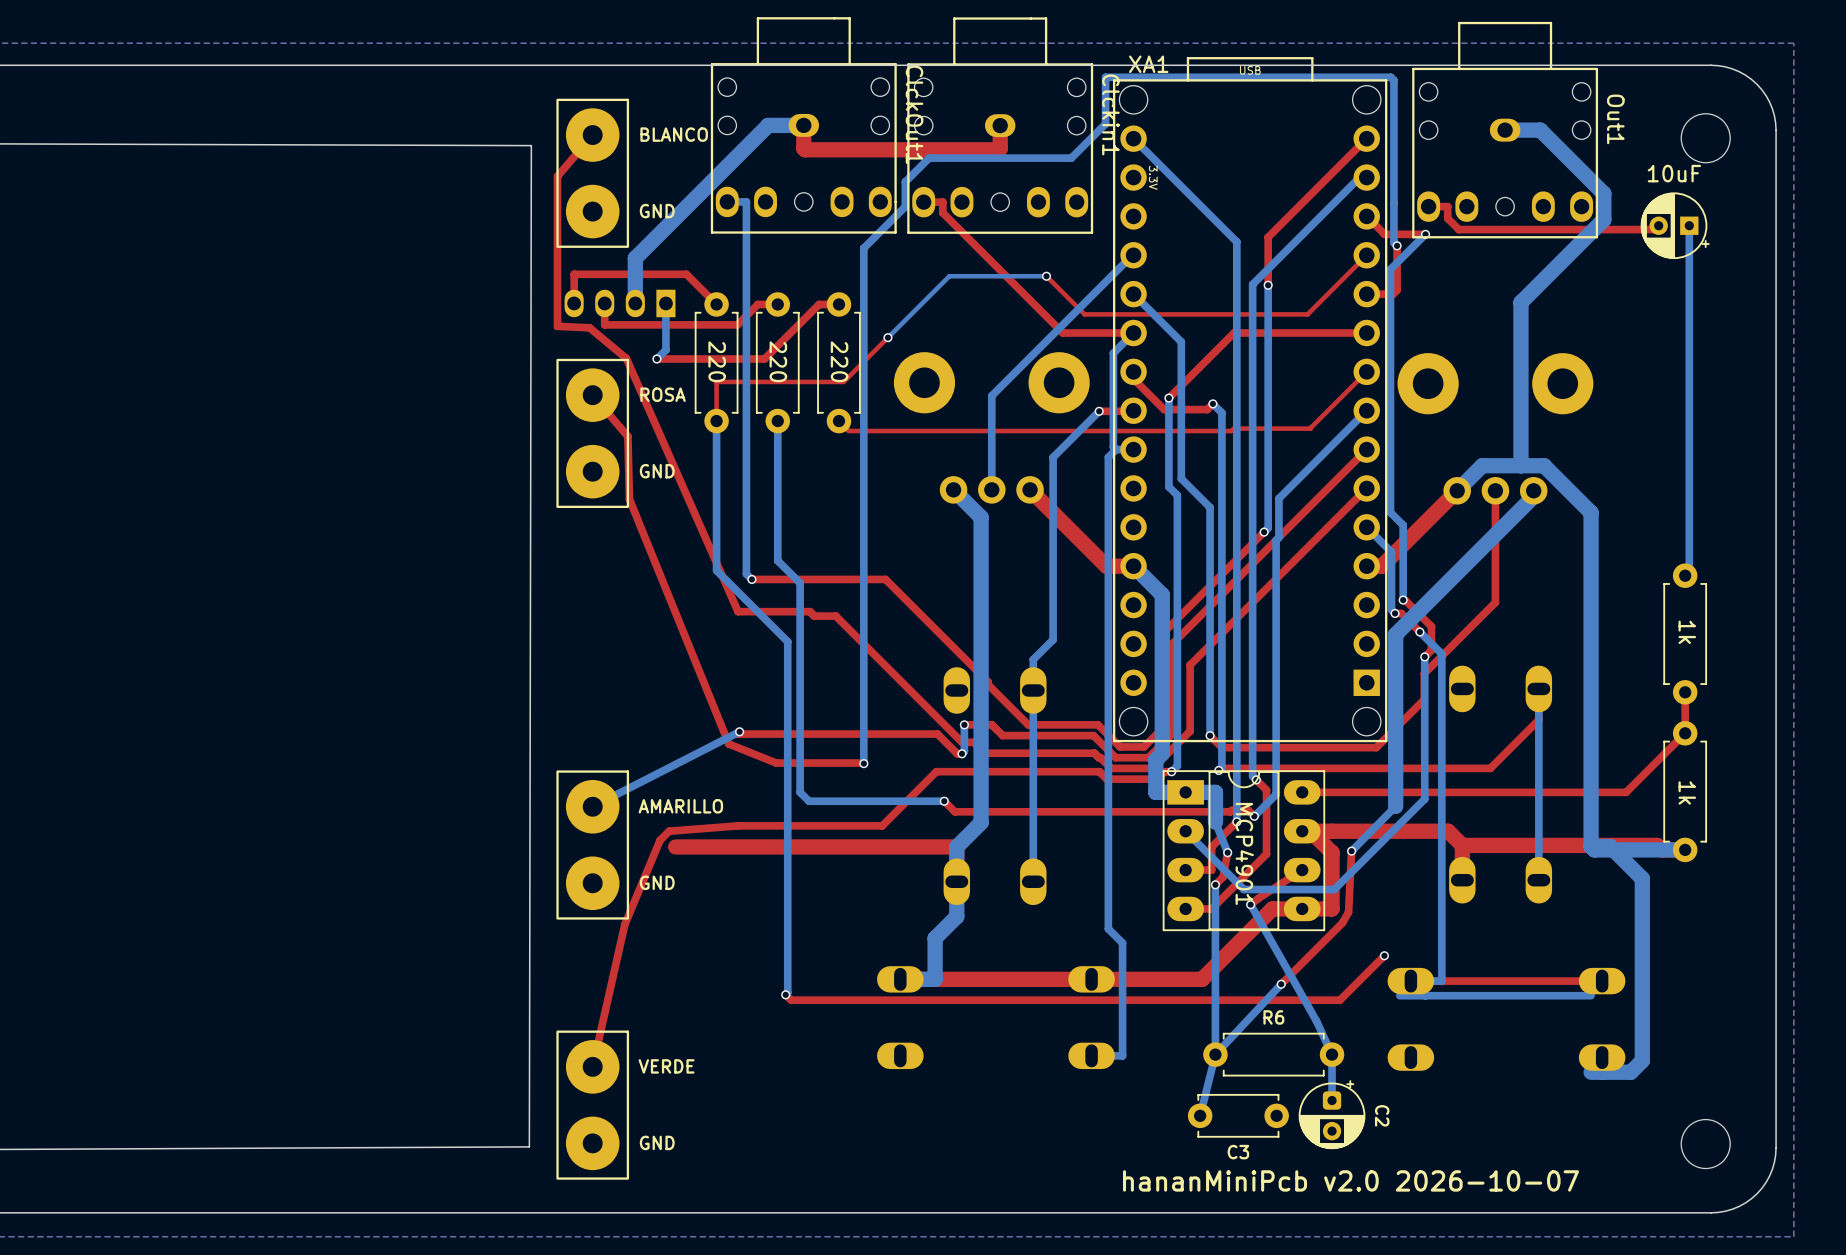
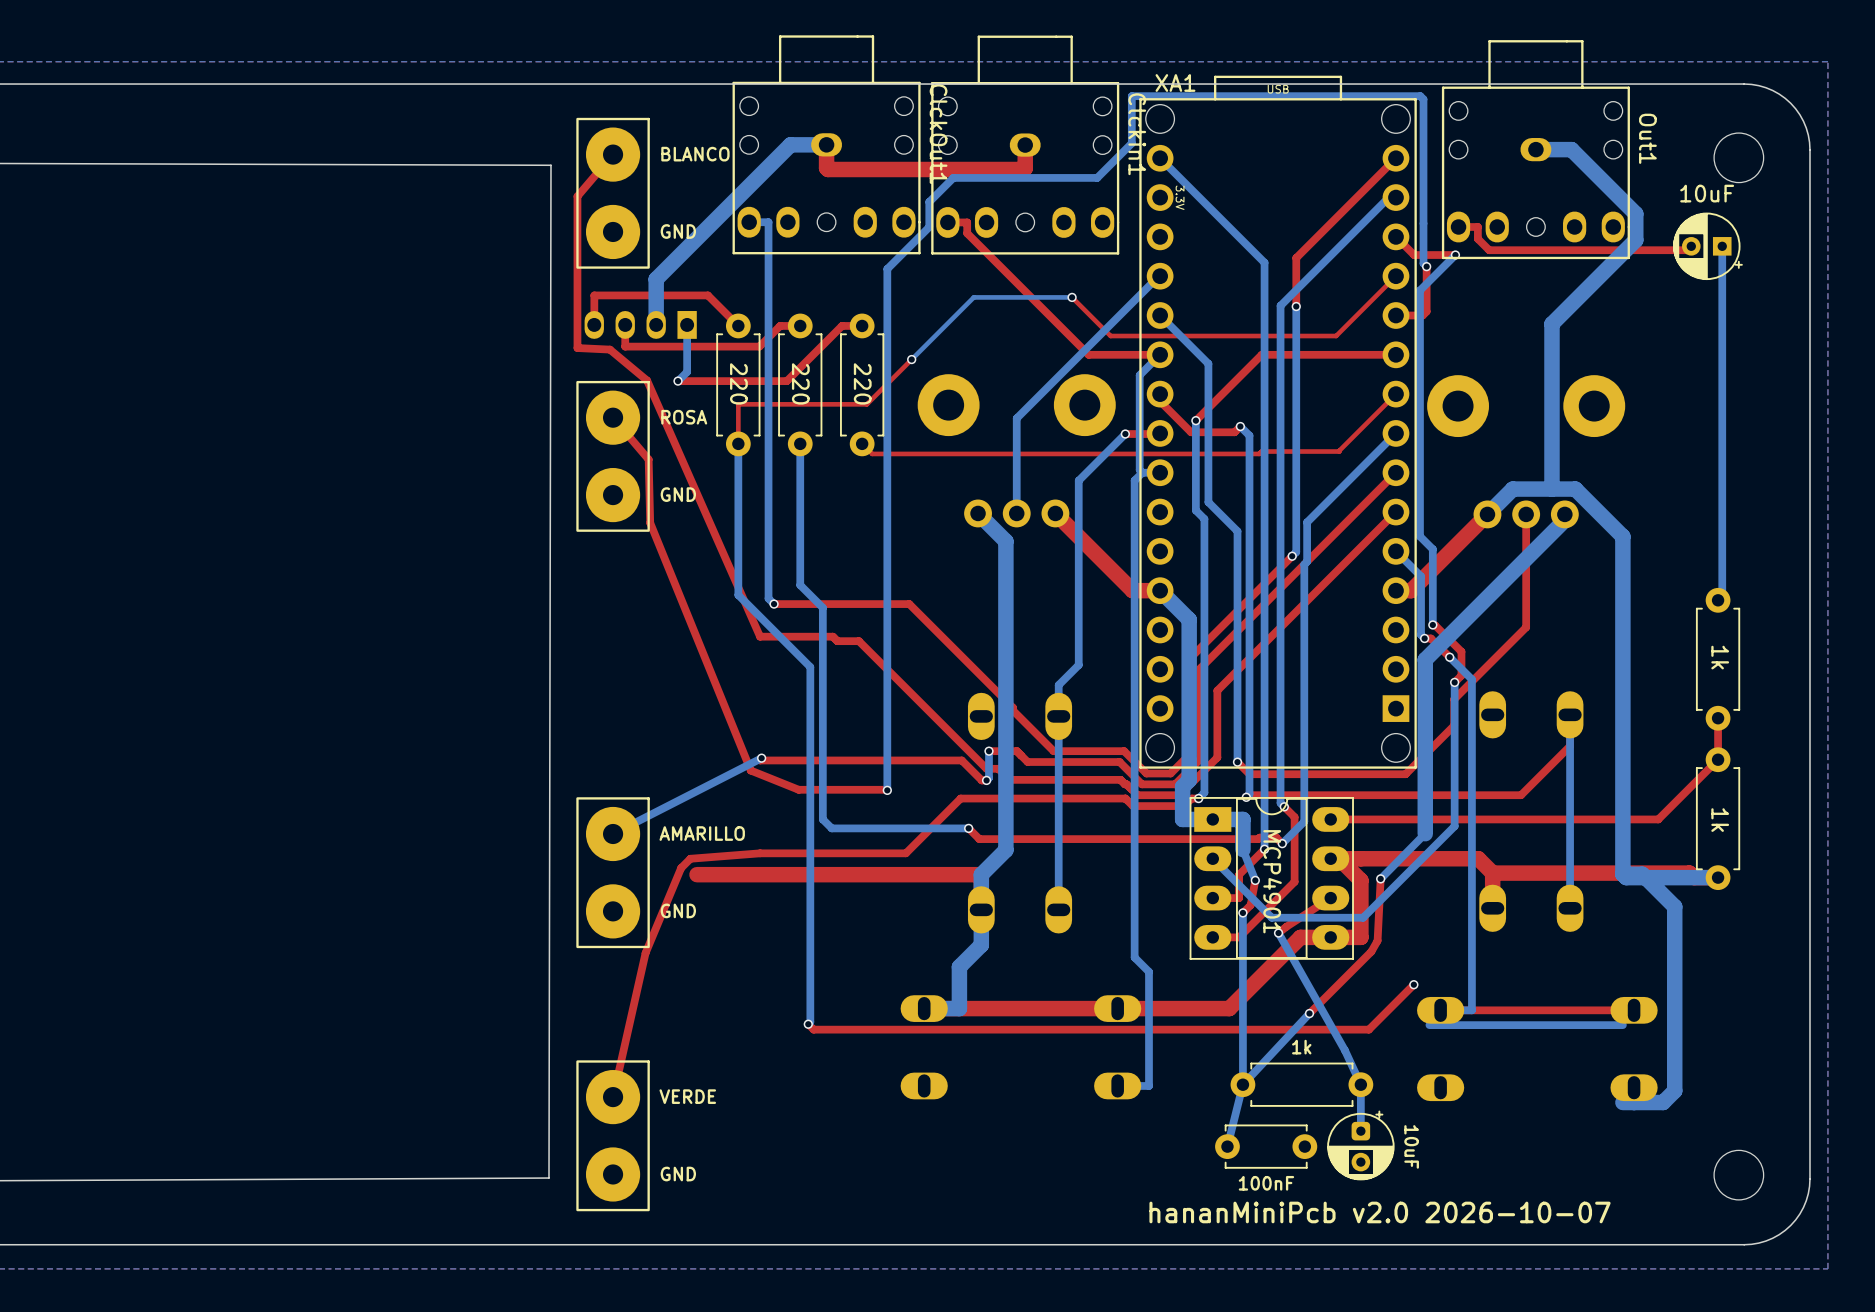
R6 name: R6 (1273, 1017) -> none
R6 value: none -> 1k (1301, 1047)
C2 name: C2 (1382, 1115) -> none
C2 value: none -> 10uF (1411, 1146)
C3 name: C3 (1238, 1152) -> none
C3 value: none -> 100nF (1266, 1183)

